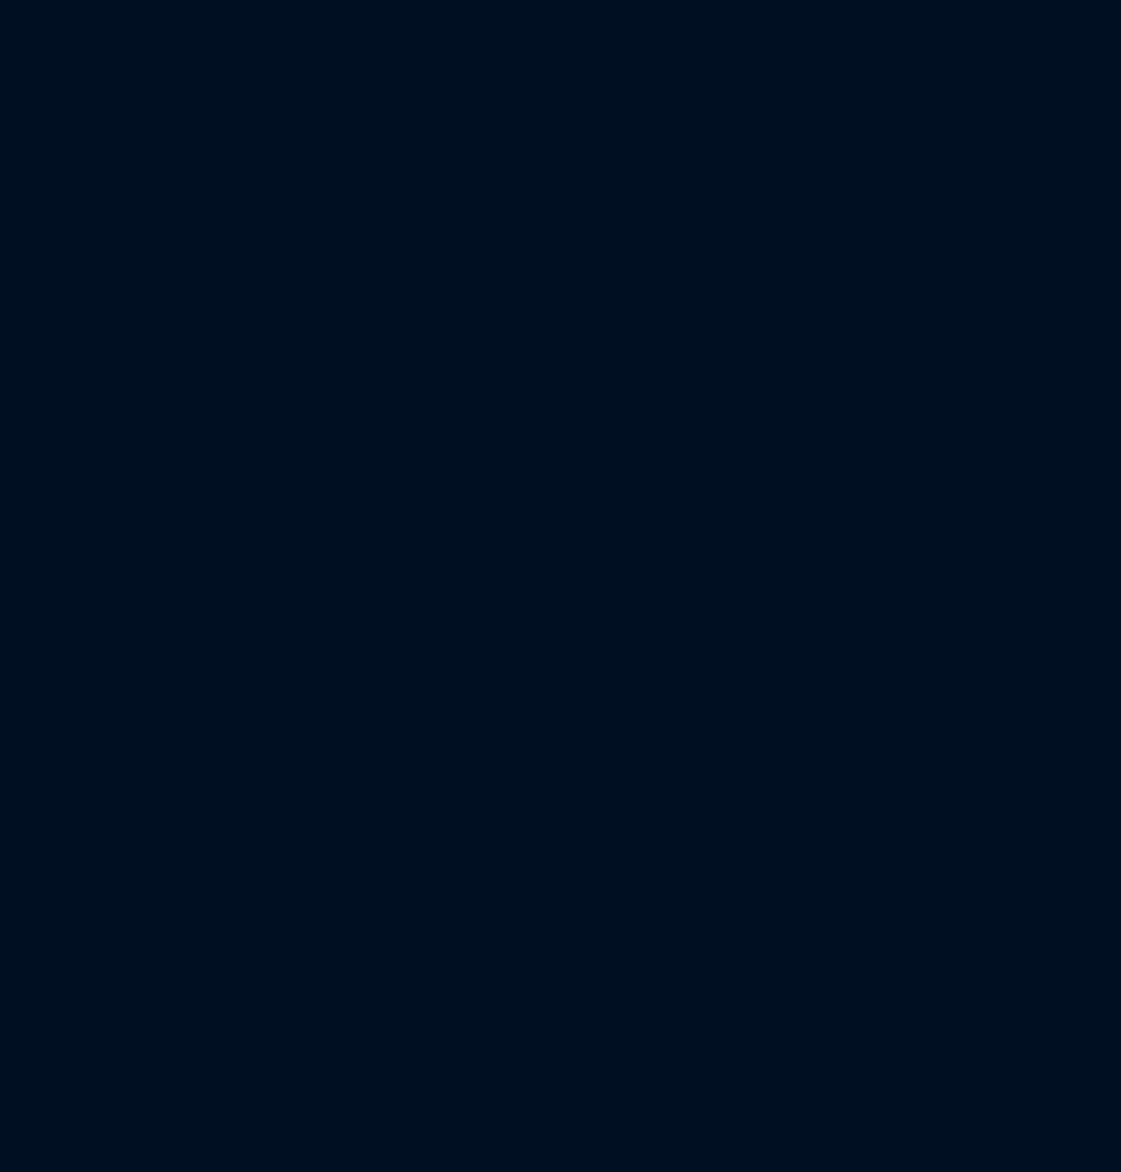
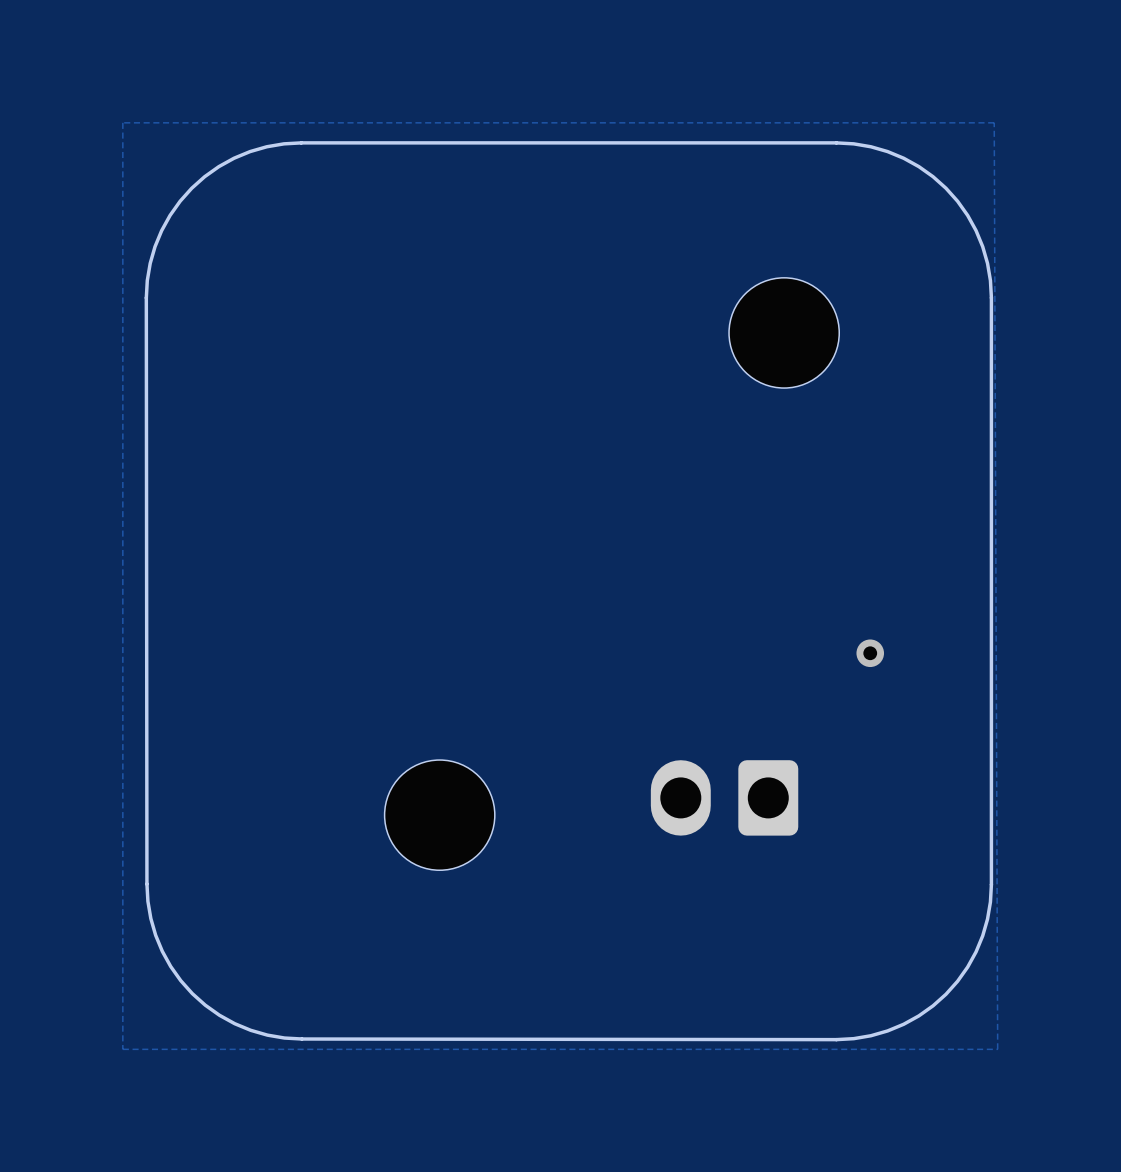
zone outline: none -> (994, 122) (122, 122) (122, 1049) (997, 1049) (994, 122)
board edge: none -> (836, 142) (283, 143) (250, 151) (218, 166) (191, 188) (180, 201) (170, 215) (155, 246) (147, 280) (146, 297) (146, 884) (150, 918) (162, 951) (180, 980) (205, 1005) (234, 1023) (250, 1030) (267, 1035) (301, 1039) (836, 1039) (870, 1035) (903, 1024) (933, 1005) (957, 981) (967, 967) (982, 935) (987, 919) (991, 884) (990, 280) (982, 246) (967, 215) (946, 188) (933, 176) (903, 158) (887, 151) (853, 143) (836, 142)
part: none -> (784, 332)
via: none -> (870, 653)
part: none -> (724, 797)
part: none -> (439, 815)

